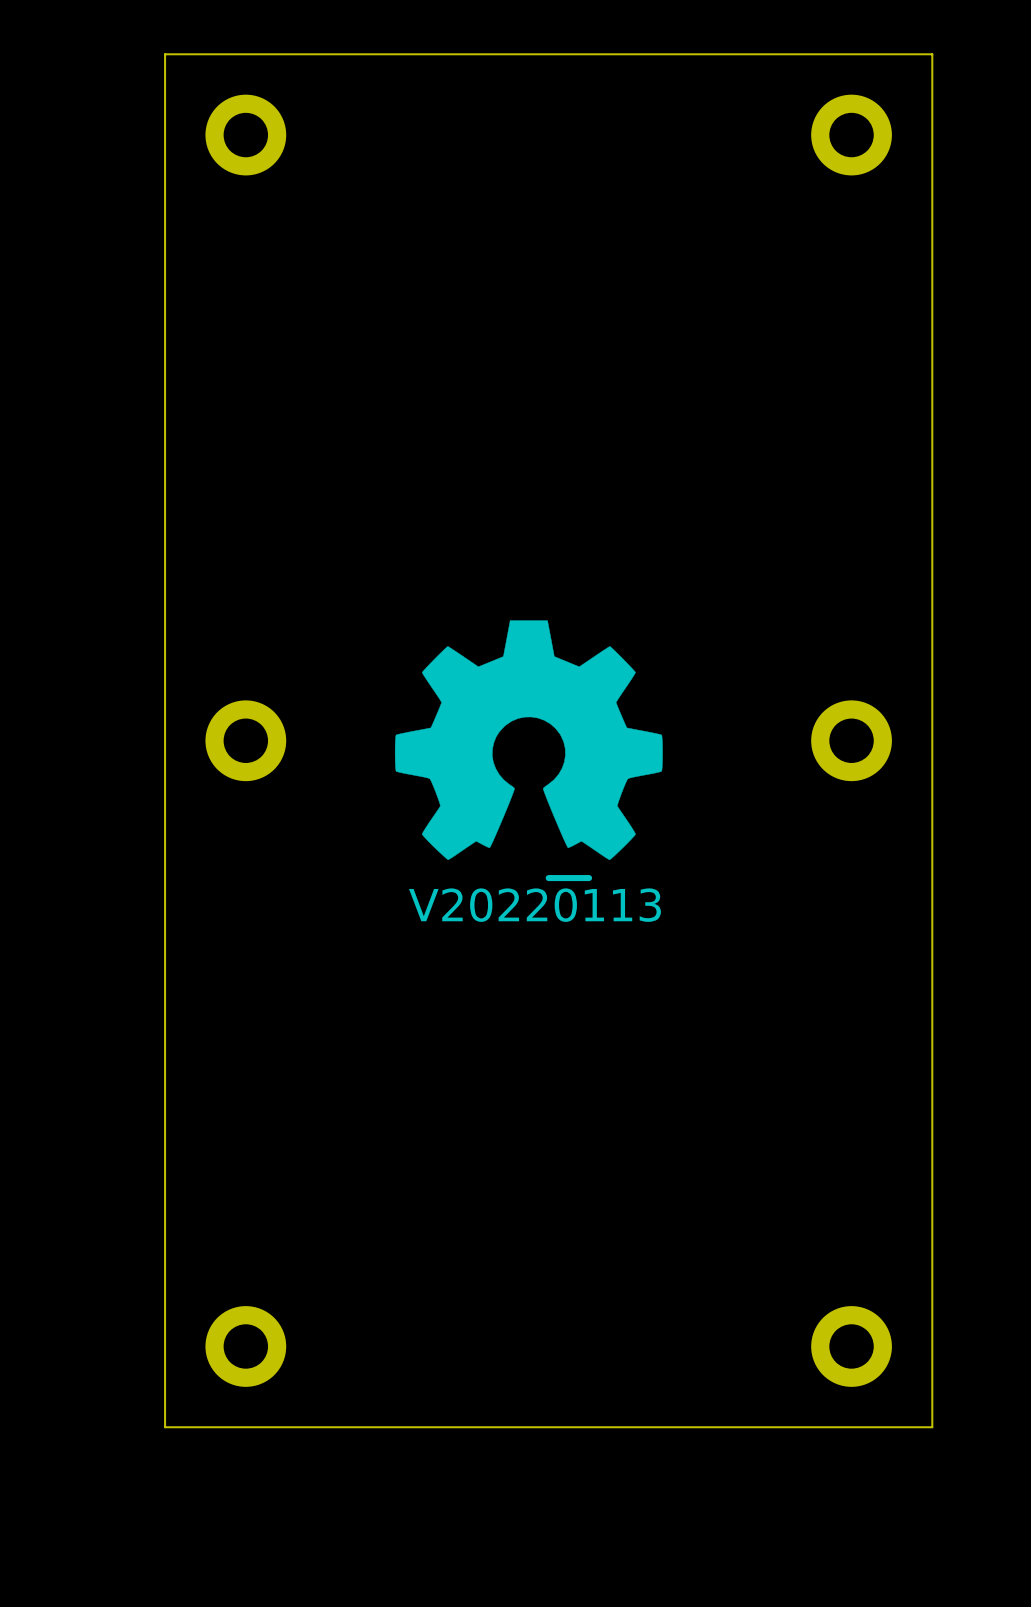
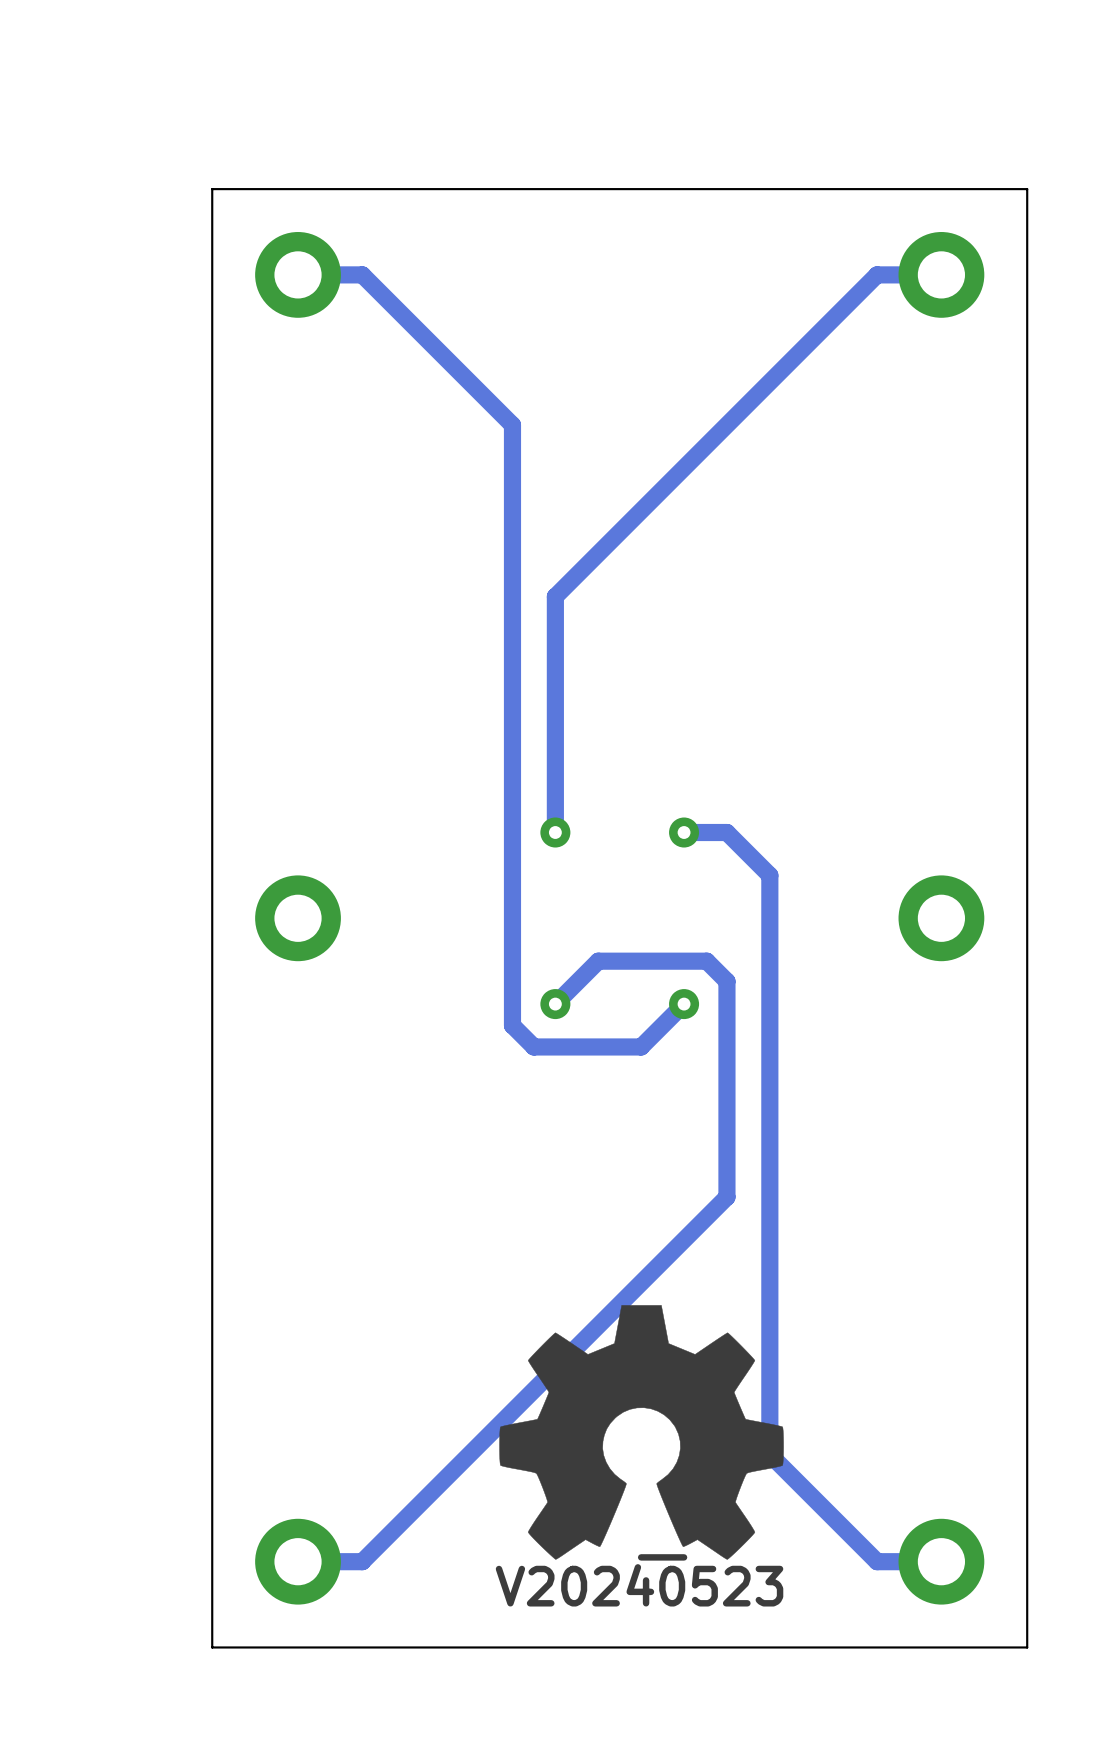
track: none -> (298, 274) (362, 274) (512, 425) (512, 1025) (533, 1046) (641, 1046) (684, 1004)
track: none -> (941, 274) (877, 274) (555, 596) (555, 832)
via: none -> (555, 832)
track: none -> (684, 832) (726, 832) (769, 875) (769, 1454) (877, 1561) (941, 1561)
via: none -> (684, 832)
drawing position: (528, 740) -> (641, 1432)
track: none -> (555, 1004) (598, 961) (706, 961) (726, 981) (726, 1197) (362, 1561) (298, 1561)
via: none -> (555, 1004)
via: none -> (684, 1004)
drawing: [545, 875, 593, 882] -> none
drawing: none -> [637, 1554, 688, 1561]

